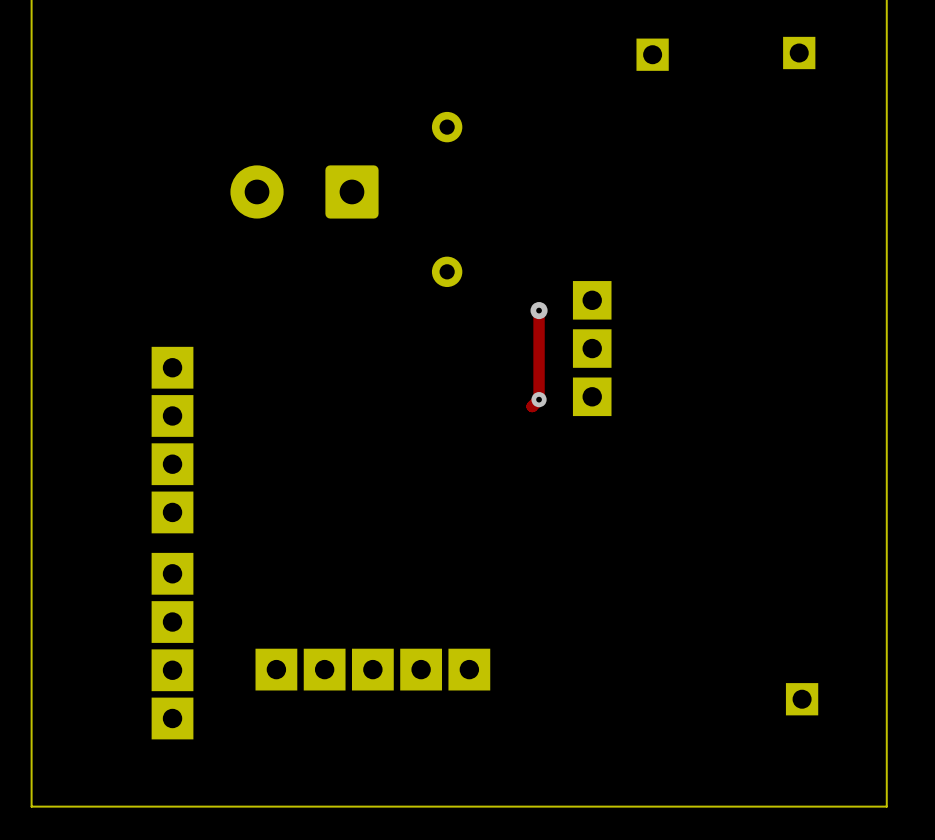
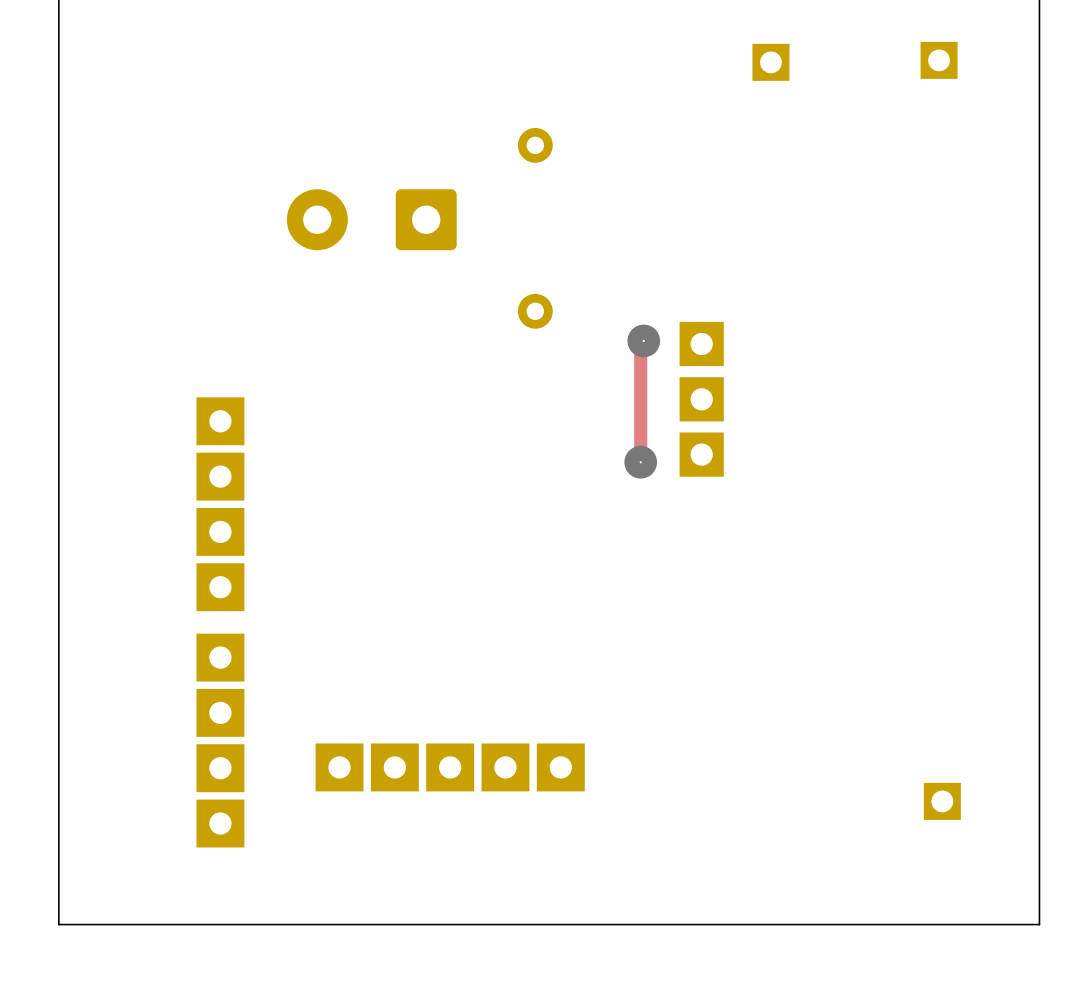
via size: [530, 302, 548, 320] -> [627, 324, 661, 358]
via size: [531, 392, 547, 408] -> [624, 445, 658, 479]

